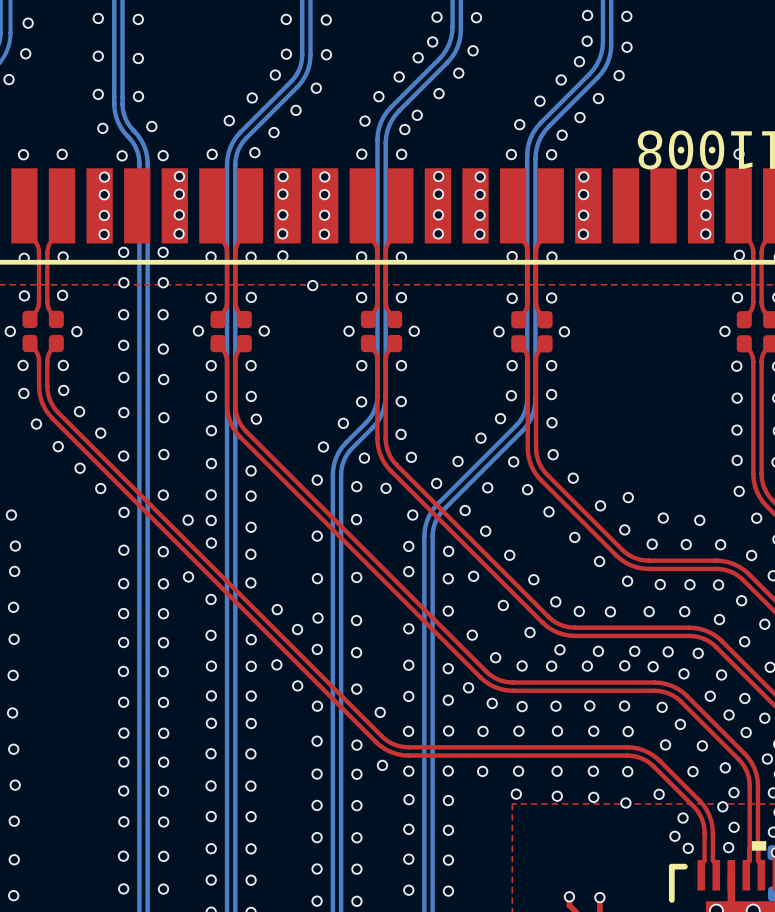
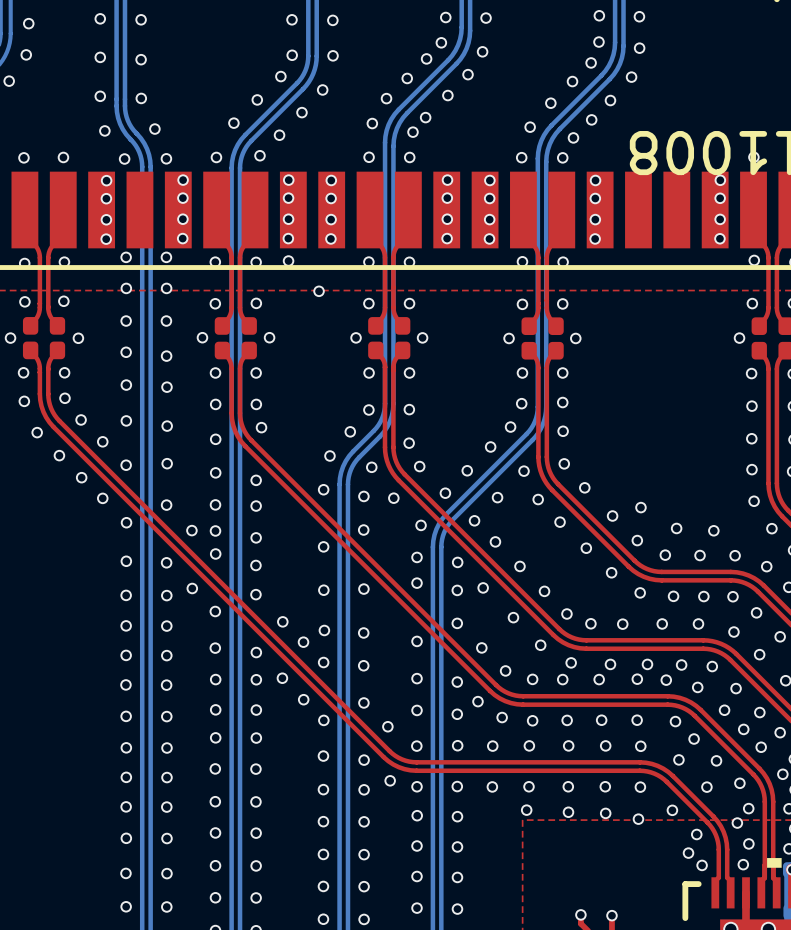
via: (11, 515) -> none
via: (15, 546) -> none
via: (14, 571) -> none
via: (13, 607) -> none
via: (14, 639) -> none
via: (13, 675) -> none
via: (12, 712) -> none
via: (13, 749) -> none
via: (15, 785) -> none
via: (14, 821) -> none
via: (14, 859) -> none
via: (13, 895) -> none

